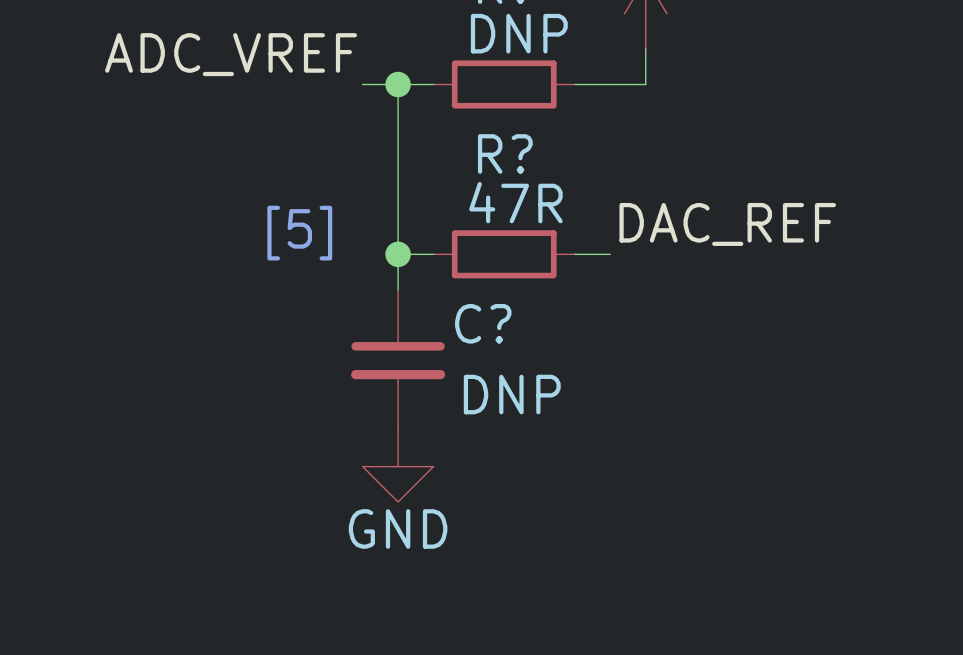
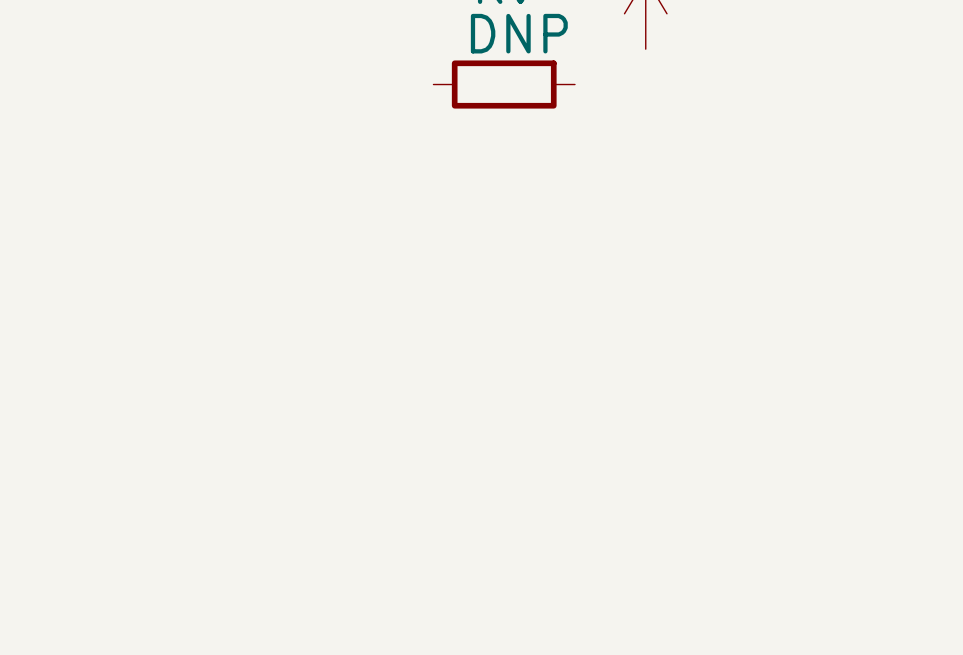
wire: (645, 49) (645, 84) (574, 84) -> none
label: ADC_VREF (231, 54) -> none
wire: (362, 84) (433, 84) -> none
wire: (398, 84) (398, 289) -> none
junction: (398, 84) -> none
label: DAC_REF (727, 224) -> none
text: [5] (299, 233) -> none
wire: (398, 254) (433, 254) -> none
junction: (398, 254) -> none
R?: 47R (504, 254) -> none
wire: (574, 254) (610, 254) -> none
C?: DNP (398, 360) -> none
power symbol: GND (398, 466) -> none

